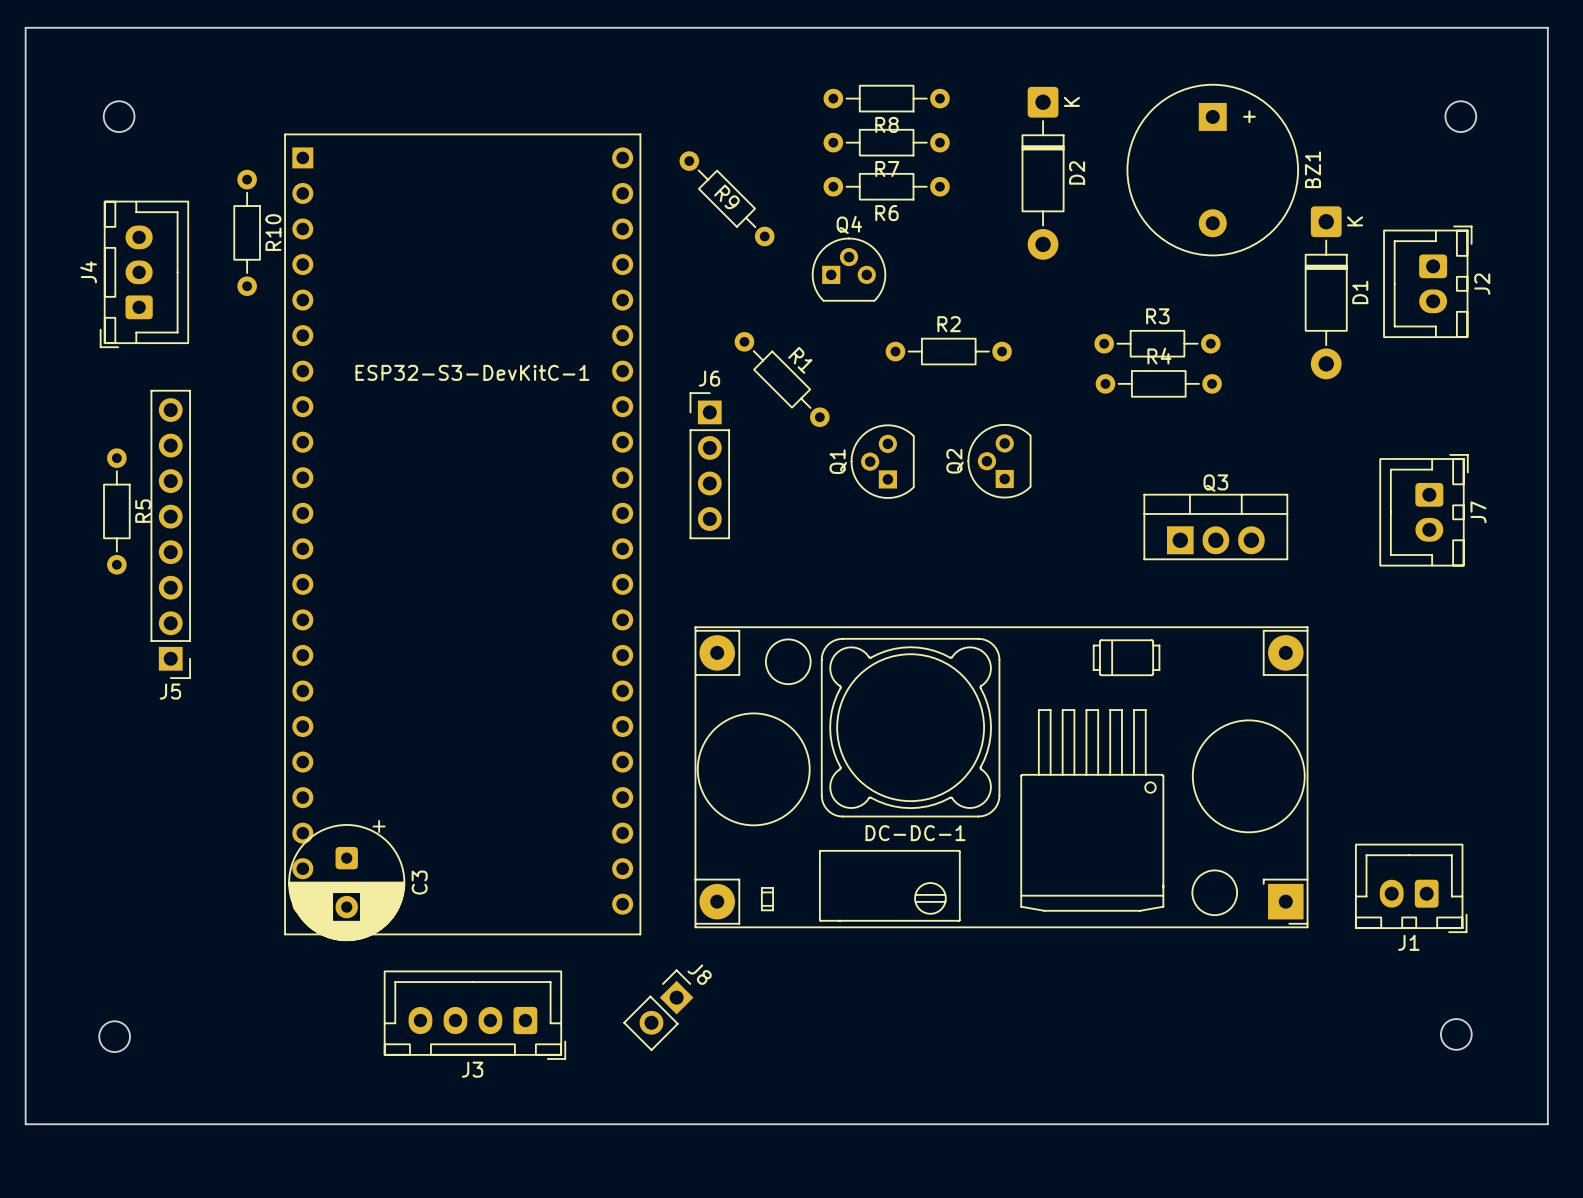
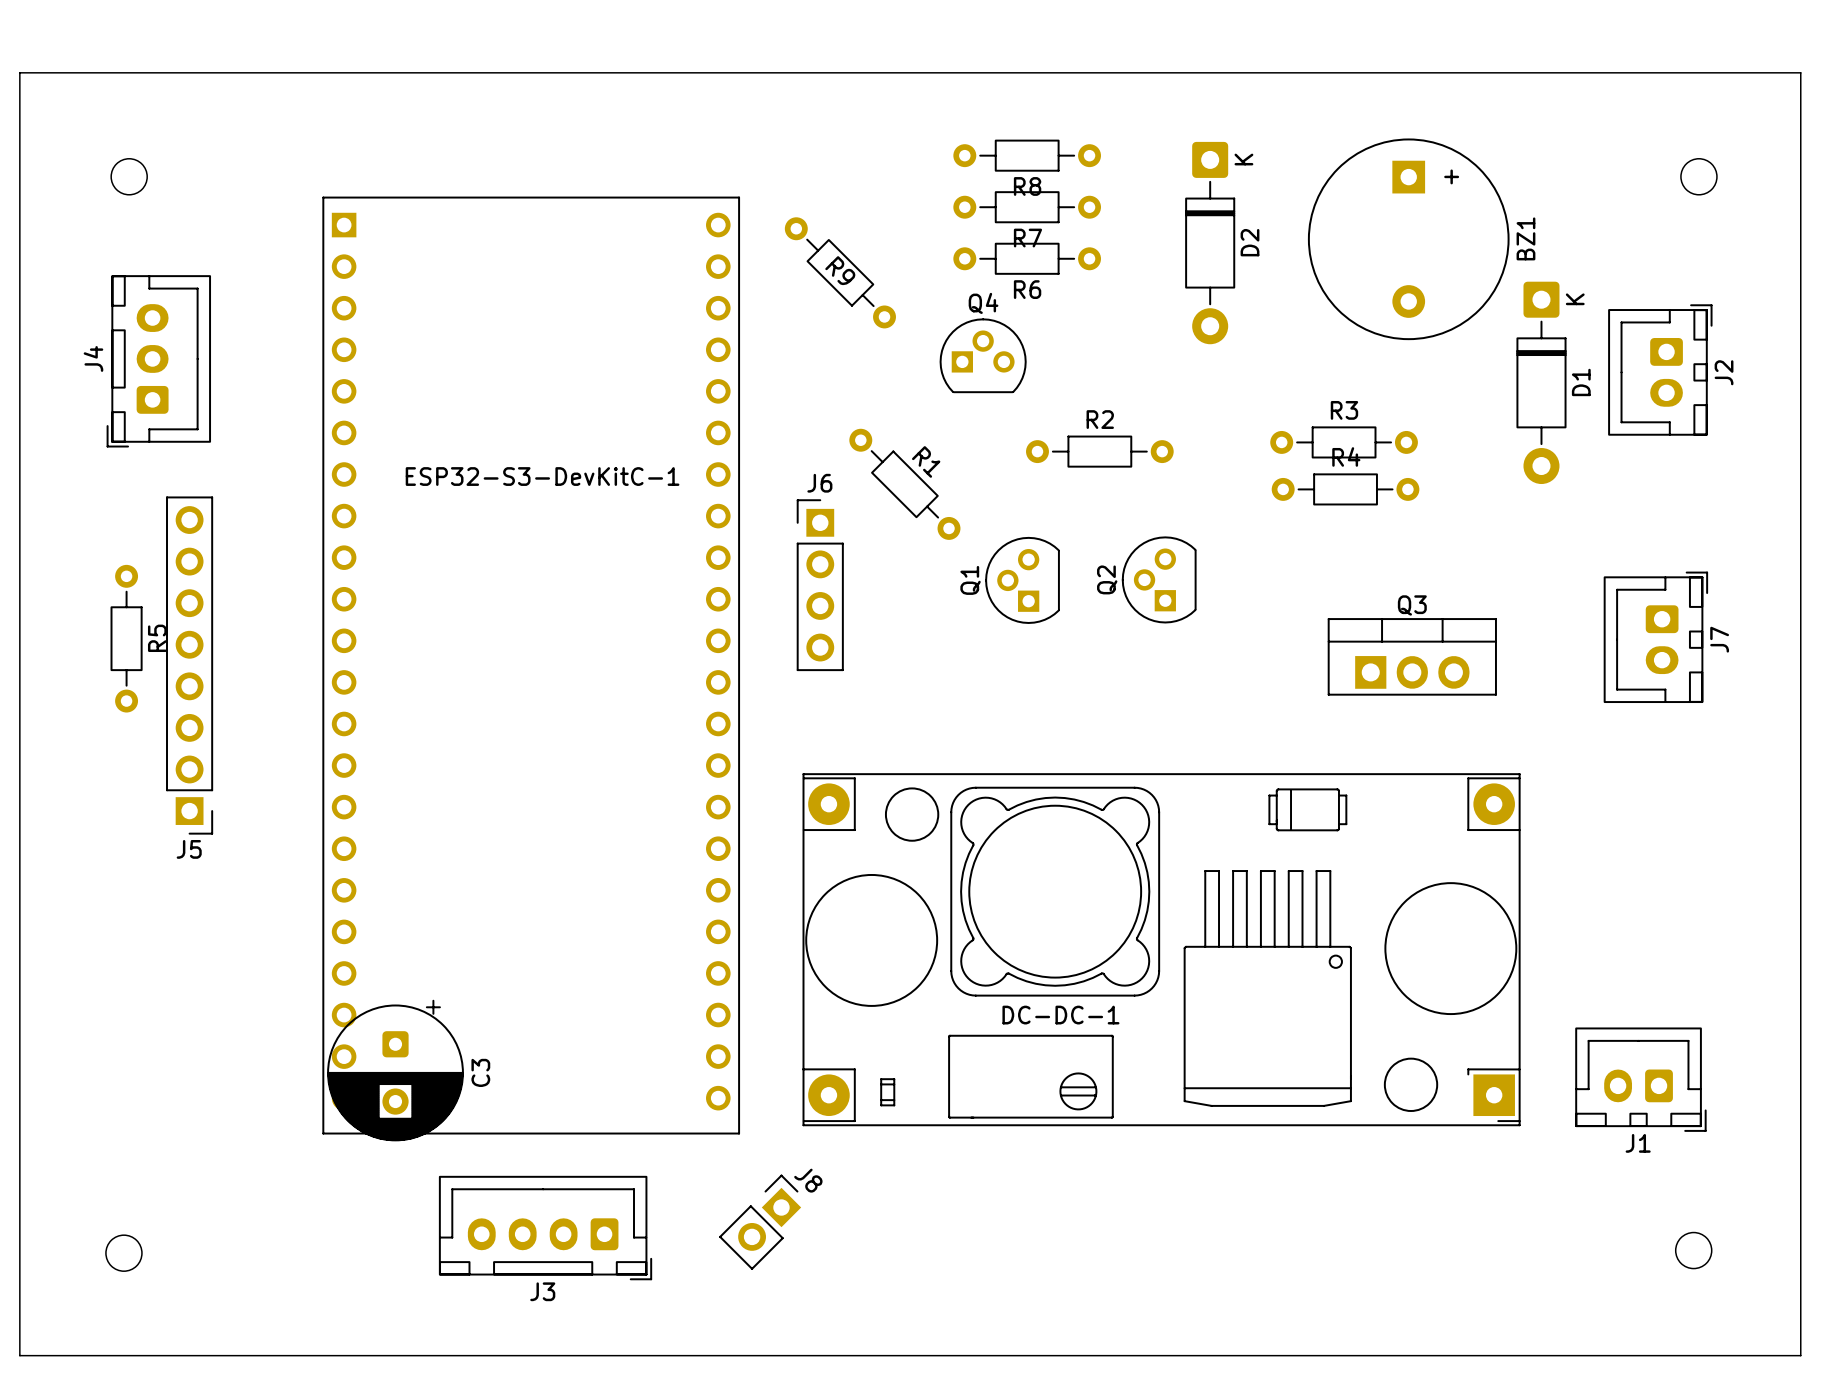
R10: (247, 232) -> none

